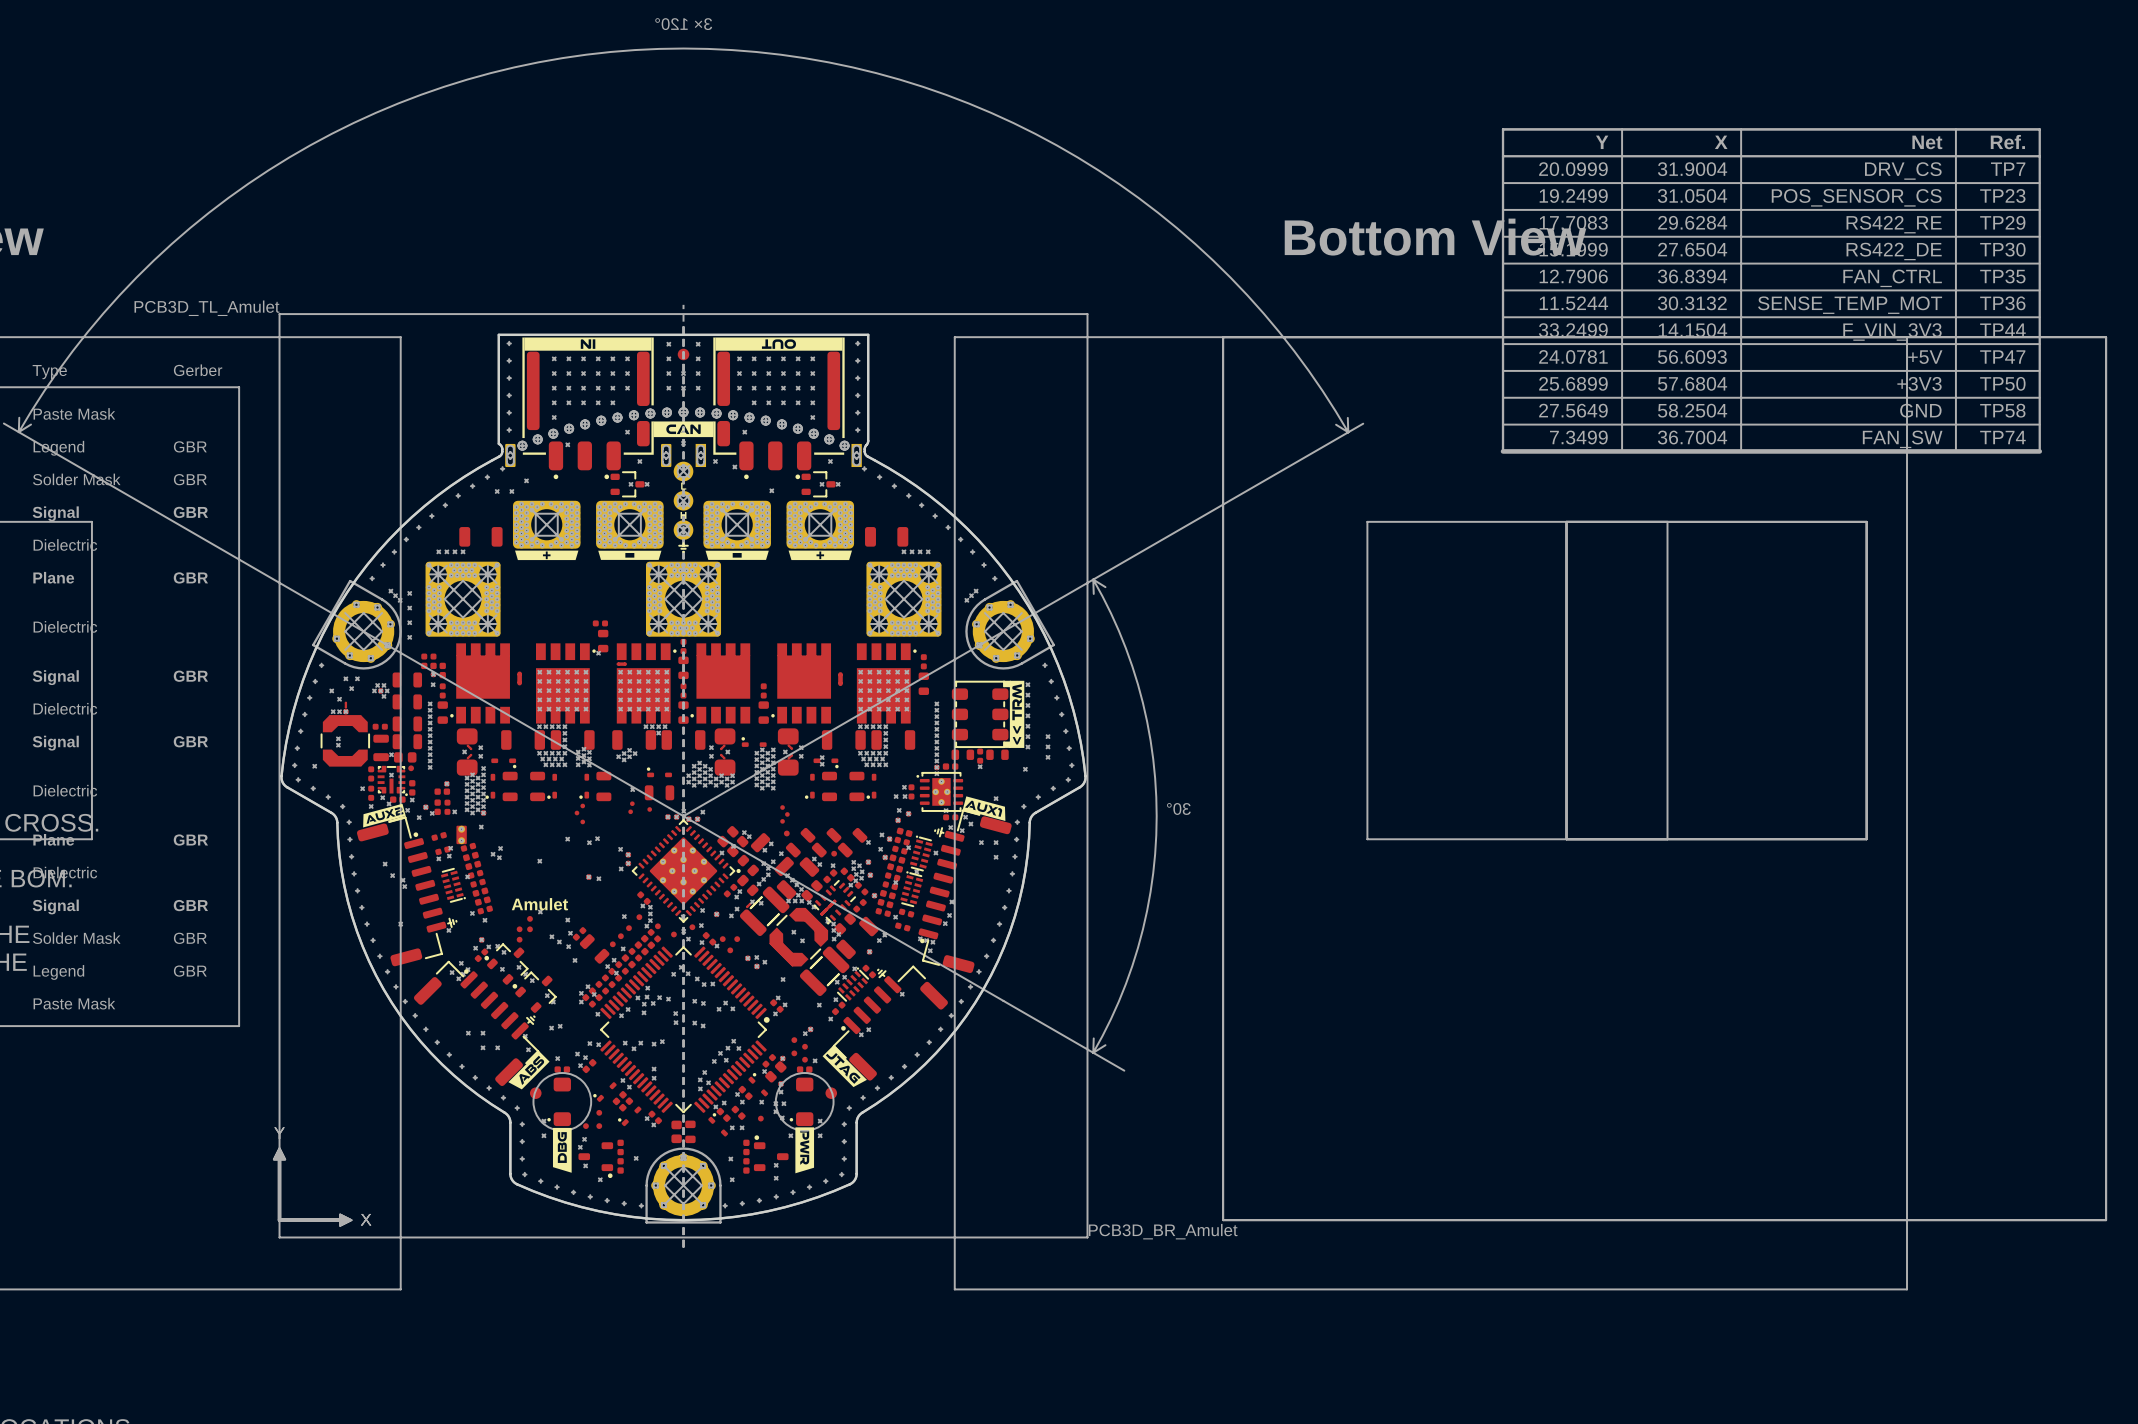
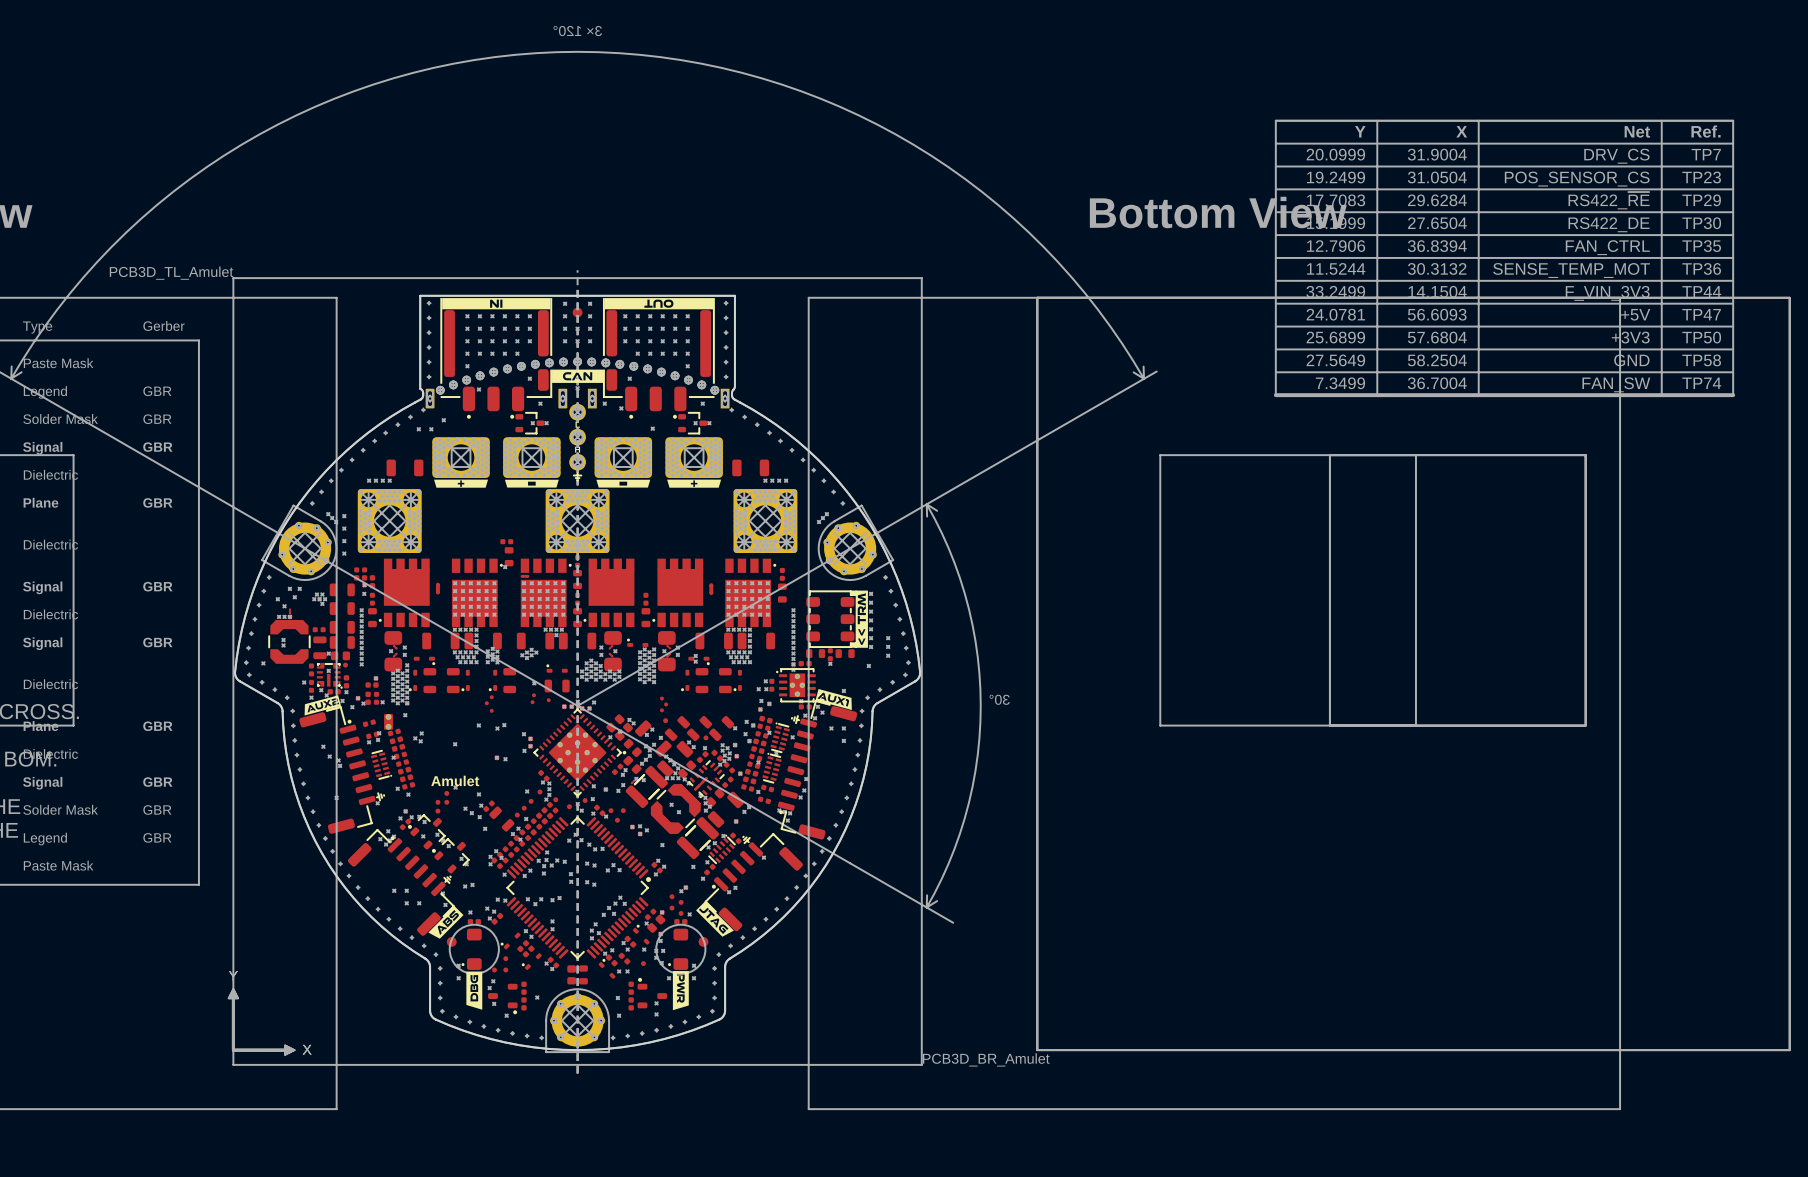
text: RS422_RE (1894, 224) -> RS422_~{RE} (1609, 200)

